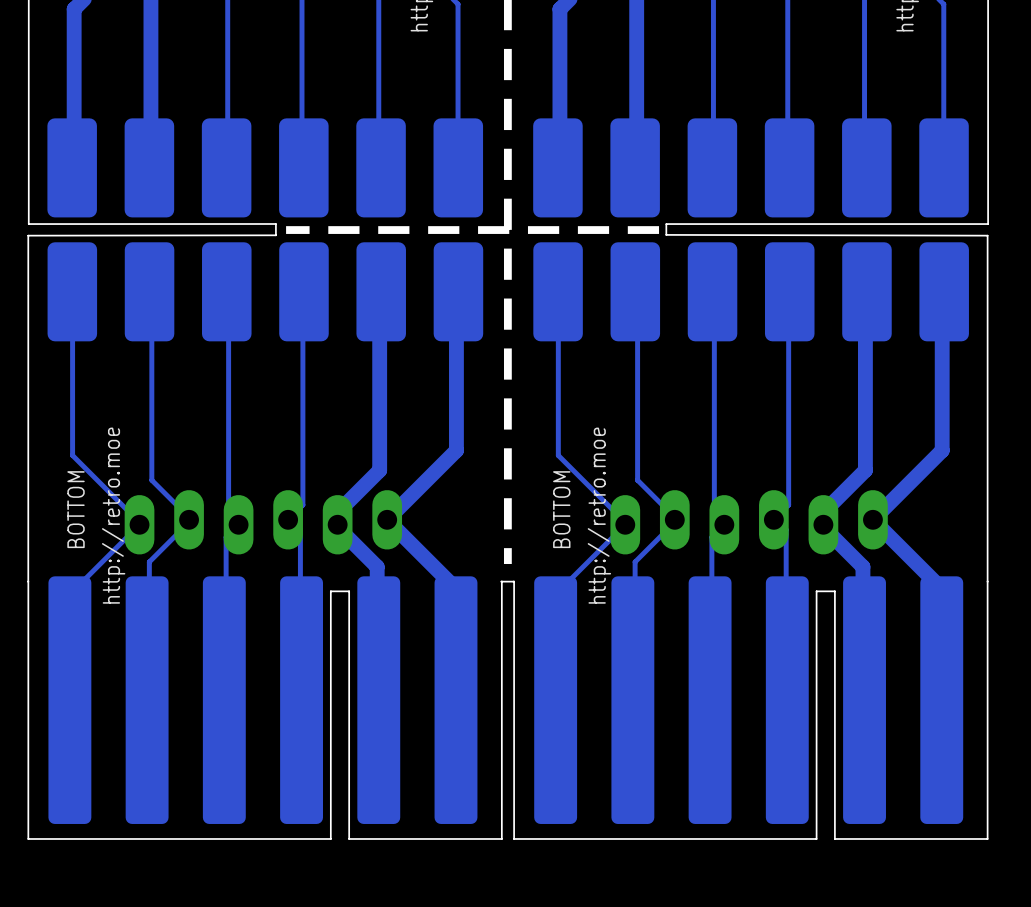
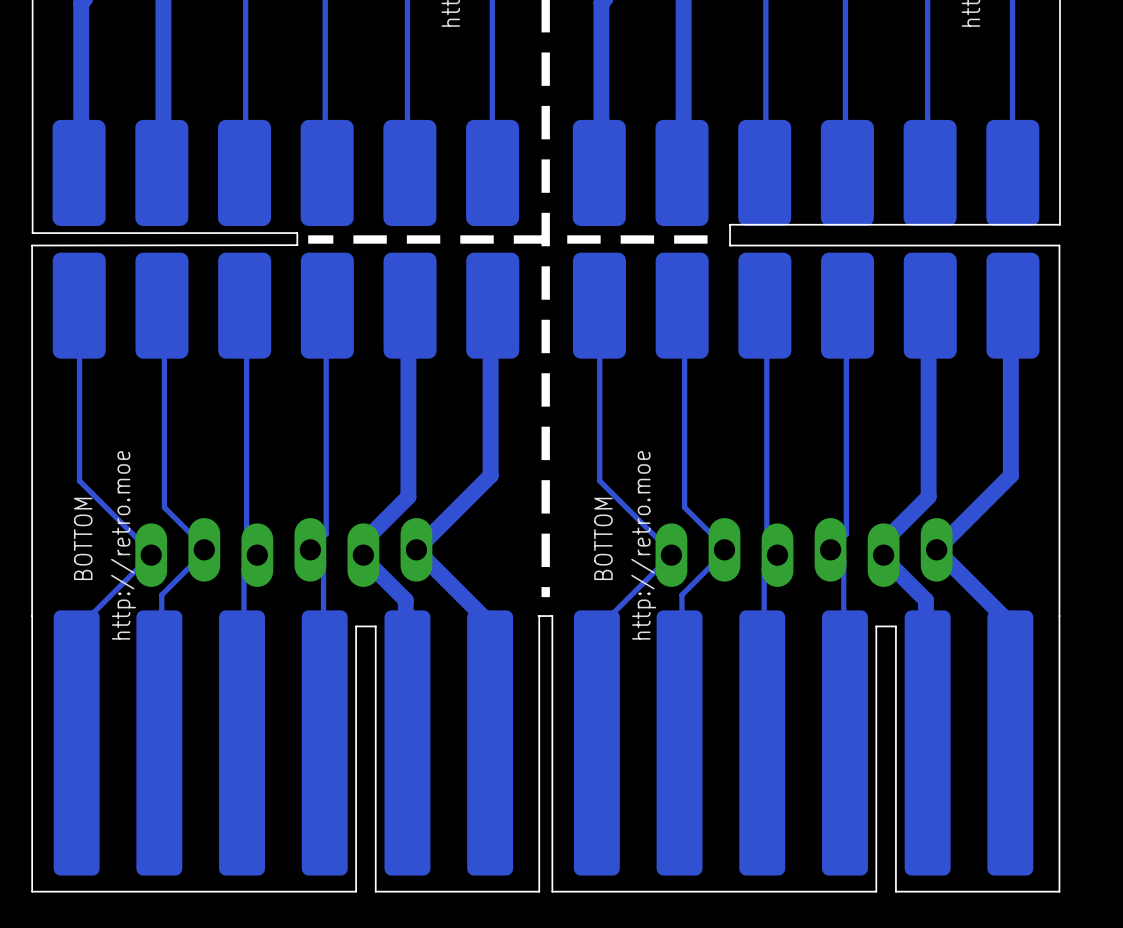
board edge: (988, 216) (988, 224) (666, 224) -> (1059, 224) (730, 224)
board edge: (666, 224) (666, 234) (987, 235) -> (730, 224) (730, 245) (1059, 245)

